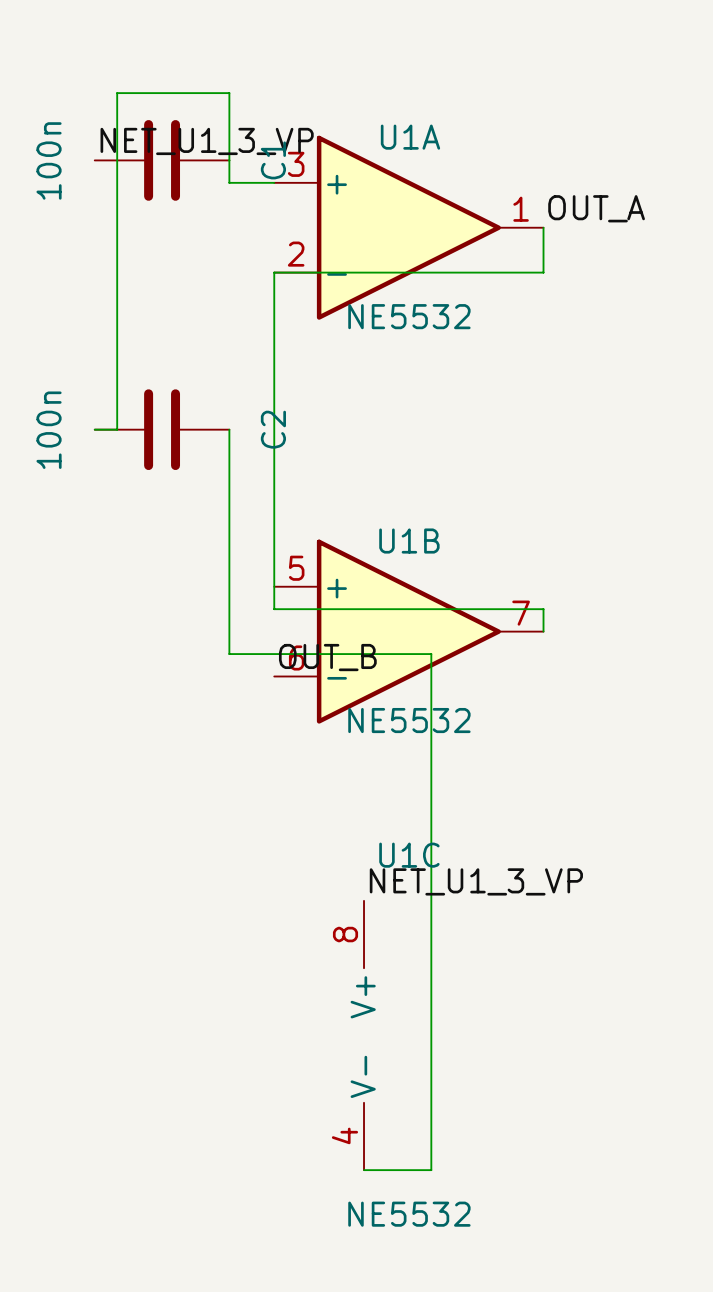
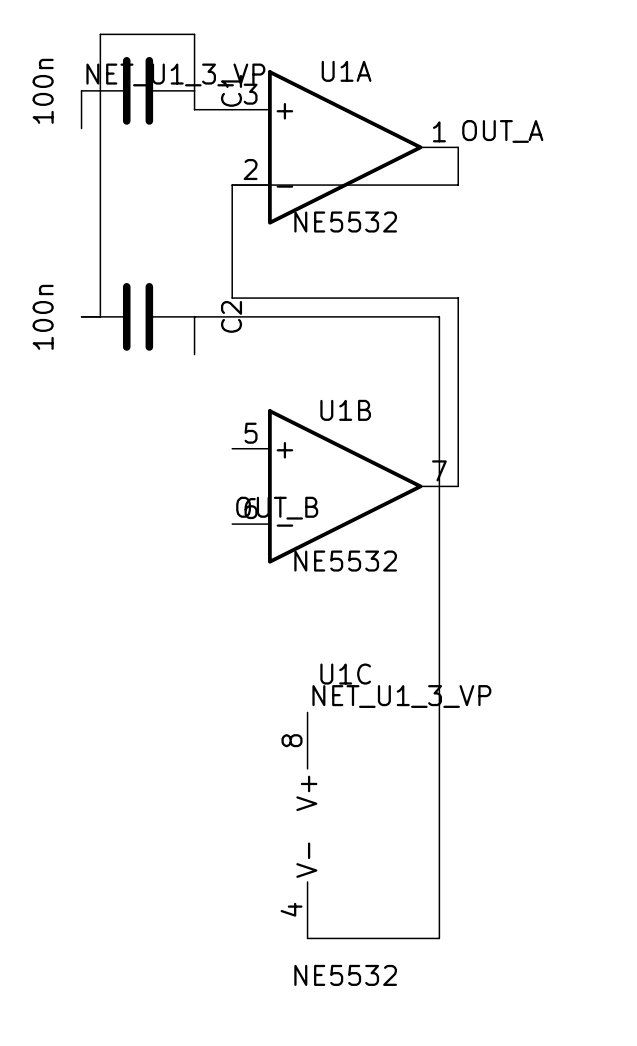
wire: none -> (81, 90) (81, 128)
wire: (274, 407) (274, 609) (543, 609) -> (232, 298) (458, 298) (458, 467)
wire: (229, 474) (229, 654) (431, 654) (431, 1170) -> (194, 316) (439, 316) (439, 938) (364, 938)

